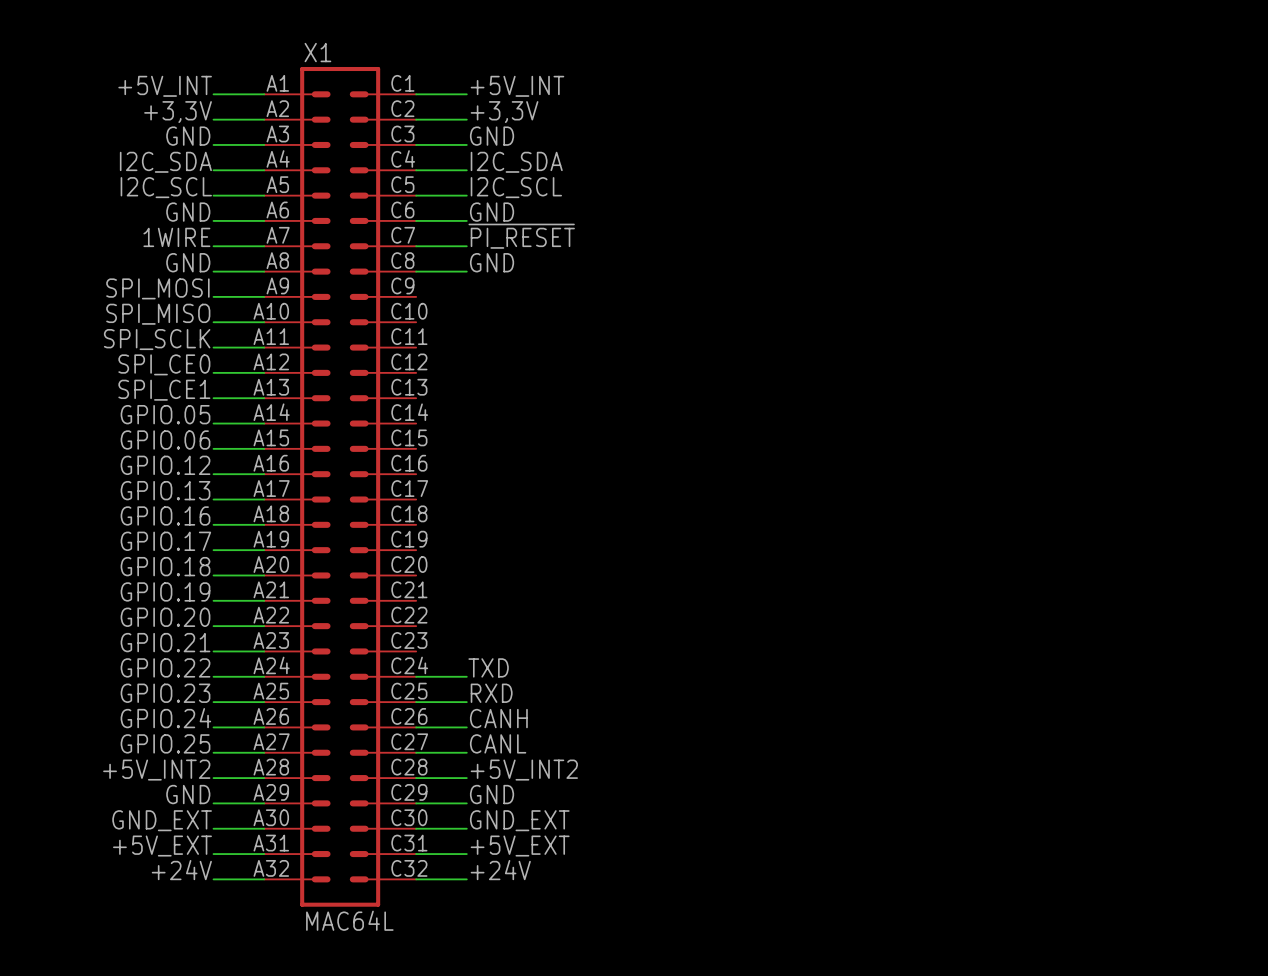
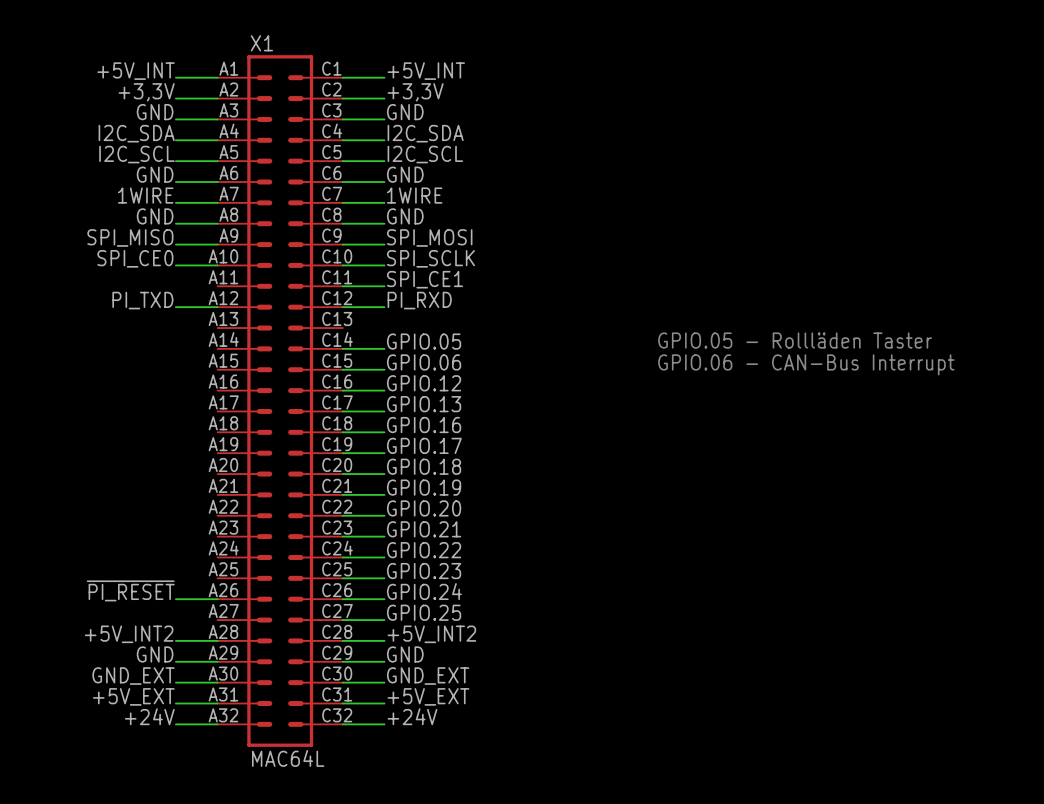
label: ~{PI_RESET} (521, 236) -> 1WIRE (414, 195)
label: SPI_MOSI (157, 288) -> SPI_MISO (130, 237)
label: none -> SPI_MOSI (429, 237)
label: SPI_MISO (158, 314) -> SPI_CE0 (135, 258)
label: none -> SPI_SCLK (430, 258)
label: SPI_SCLK (157, 339) -> none
label: none -> SPI_CE1 (425, 279)
wire: (213, 347) (264, 347) -> (342, 244) (384, 244)
label: SPI_CE0 (164, 364) -> PI_TXD (142, 300)
label: none -> PI_RXD (419, 300)
label: SPI_CE1 (164, 390) -> none
wire: (213, 398) (264, 398) -> (342, 286) (384, 286)
text: none -> GPIO.05 - Rollläden Taster (795, 340)
label: GPIO.05 (165, 414) -> none
label: none -> GPIO.05 (424, 341)
wire: (213, 423) (264, 423) -> (342, 307) (384, 307)
label: GPIO.06 (165, 440) -> none
label: none -> GPIO.06 (424, 362)
text: none -> GPIO.06 - CAN-Bus Interrupt (806, 364)
wire: (213, 448) (264, 448) -> (342, 265) (384, 265)
label: GPIO.12 (165, 465) -> none
label: none -> GPIO.12 (424, 383)
wire: (213, 474) (264, 474) -> (342, 348) (384, 348)
label: GPIO.13 (165, 490) -> none
label: none -> GPIO.13 (424, 404)
wire: (213, 499) (264, 499) -> (342, 369) (384, 369)
label: GPIO.16 (165, 515) -> none
label: none -> GPIO.16 (424, 425)
wire: (213, 524) (264, 524) -> (342, 390) (384, 390)
label: GPIO.17 (165, 541) -> none
label: none -> GPIO.17 (424, 445)
wire: (213, 550) (264, 550) -> (342, 411) (384, 411)
label: GPIO.18 (165, 566) -> none
label: none -> GPIO.18 (424, 466)
wire: (213, 575) (264, 575) -> (342, 432) (384, 432)
label: GPIO.19 (165, 591) -> none
label: none -> GPIO.19 (424, 487)
wire: (213, 600) (264, 600) -> (342, 453) (384, 453)
label: GPIO.20 (165, 617) -> none
label: none -> GPIO.20 (424, 508)
wire: (213, 626) (264, 626) -> (342, 474) (384, 474)
label: GPIO.21 (165, 642) -> none
label: none -> GPIO.21 (424, 529)
wire: (213, 651) (264, 651) -> (342, 494) (384, 494)
label: GPIO.22 (165, 667) -> none
label: TXD (488, 667) -> GPIO.22 (424, 550)
wire: (213, 676) (264, 676) -> (342, 515) (384, 515)
label: GPIO.23 (165, 693) -> none
label: RXD (491, 693) -> GPIO.23 (424, 571)
wire: (213, 702) (264, 702) -> (342, 536) (384, 536)
label: GPIO.24 (165, 718) -> ~{PI_RESET} (130, 590)
label: CANH (498, 718) -> GPIO.24 (424, 591)
label: GPIO.25 (165, 743) -> none
label: CANL (498, 743) -> GPIO.25 (424, 612)
wire: (213, 752) (264, 752) -> none

